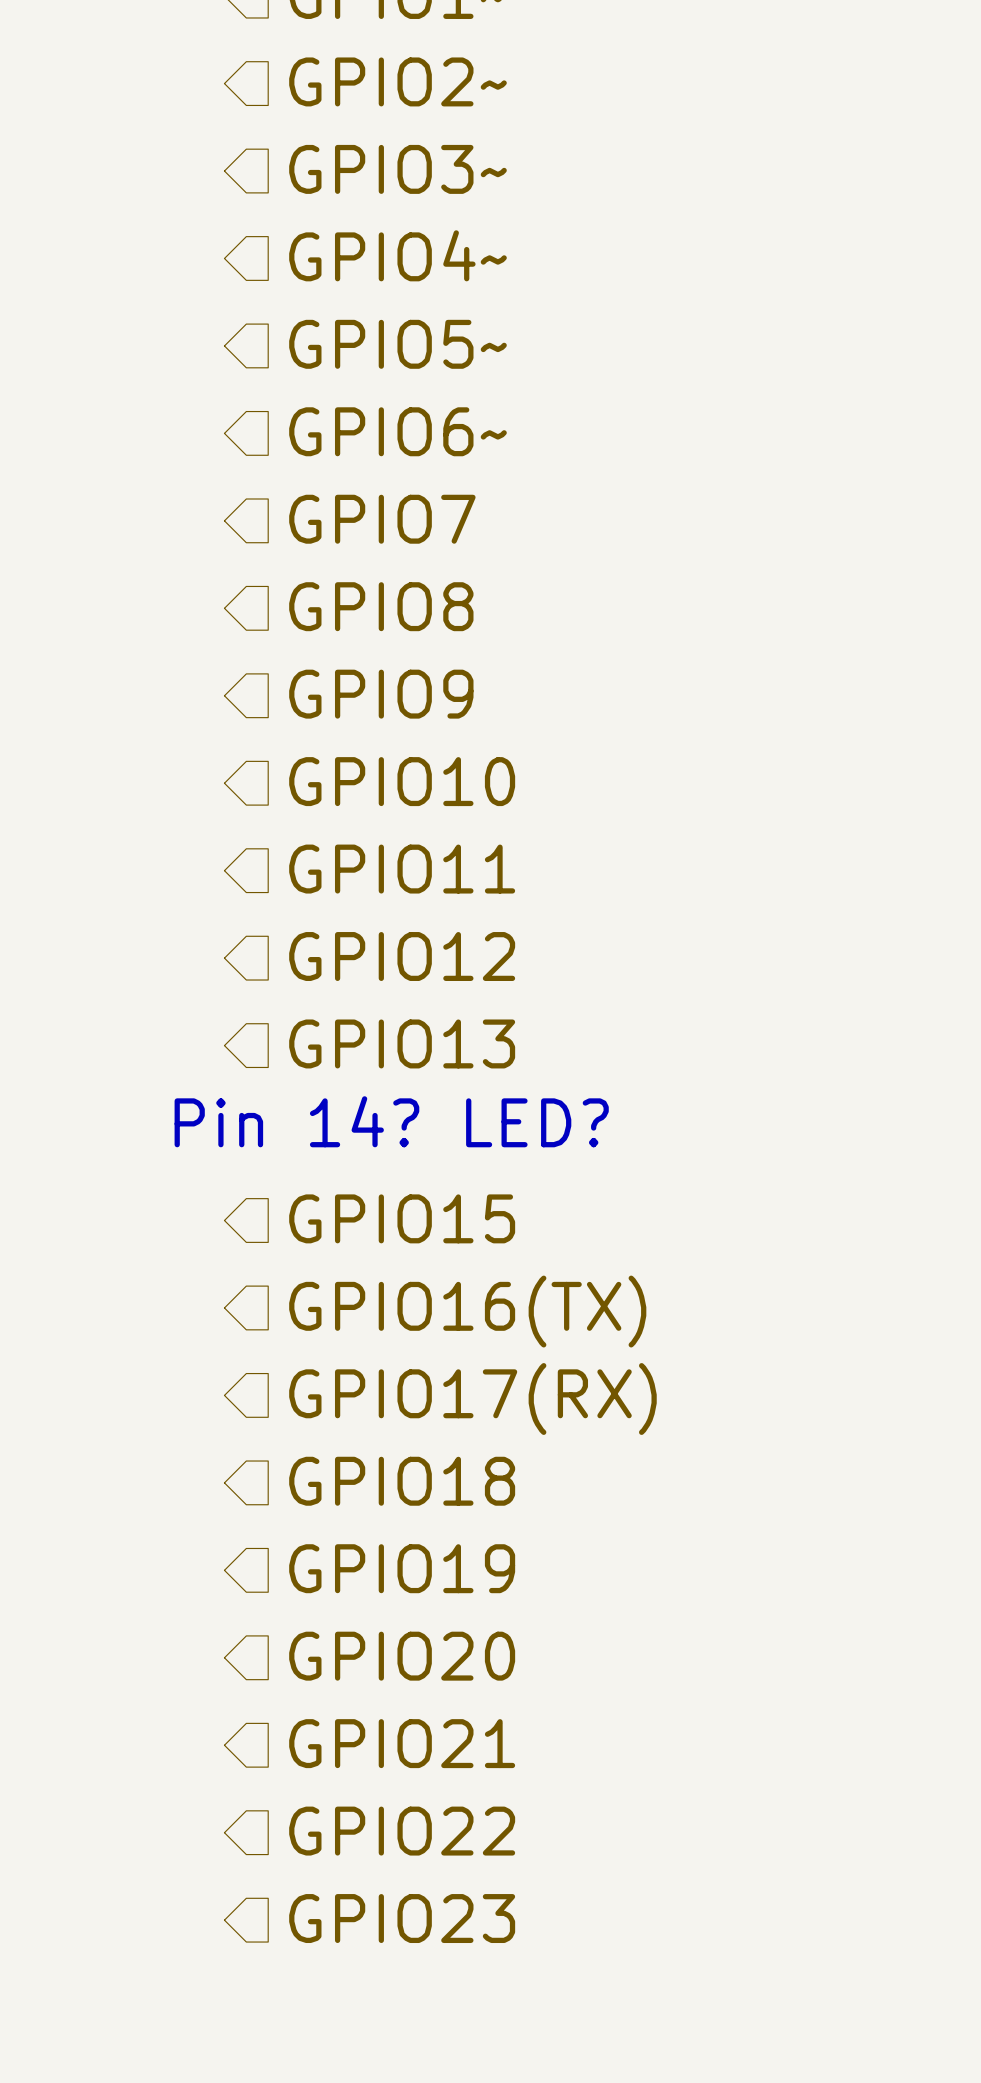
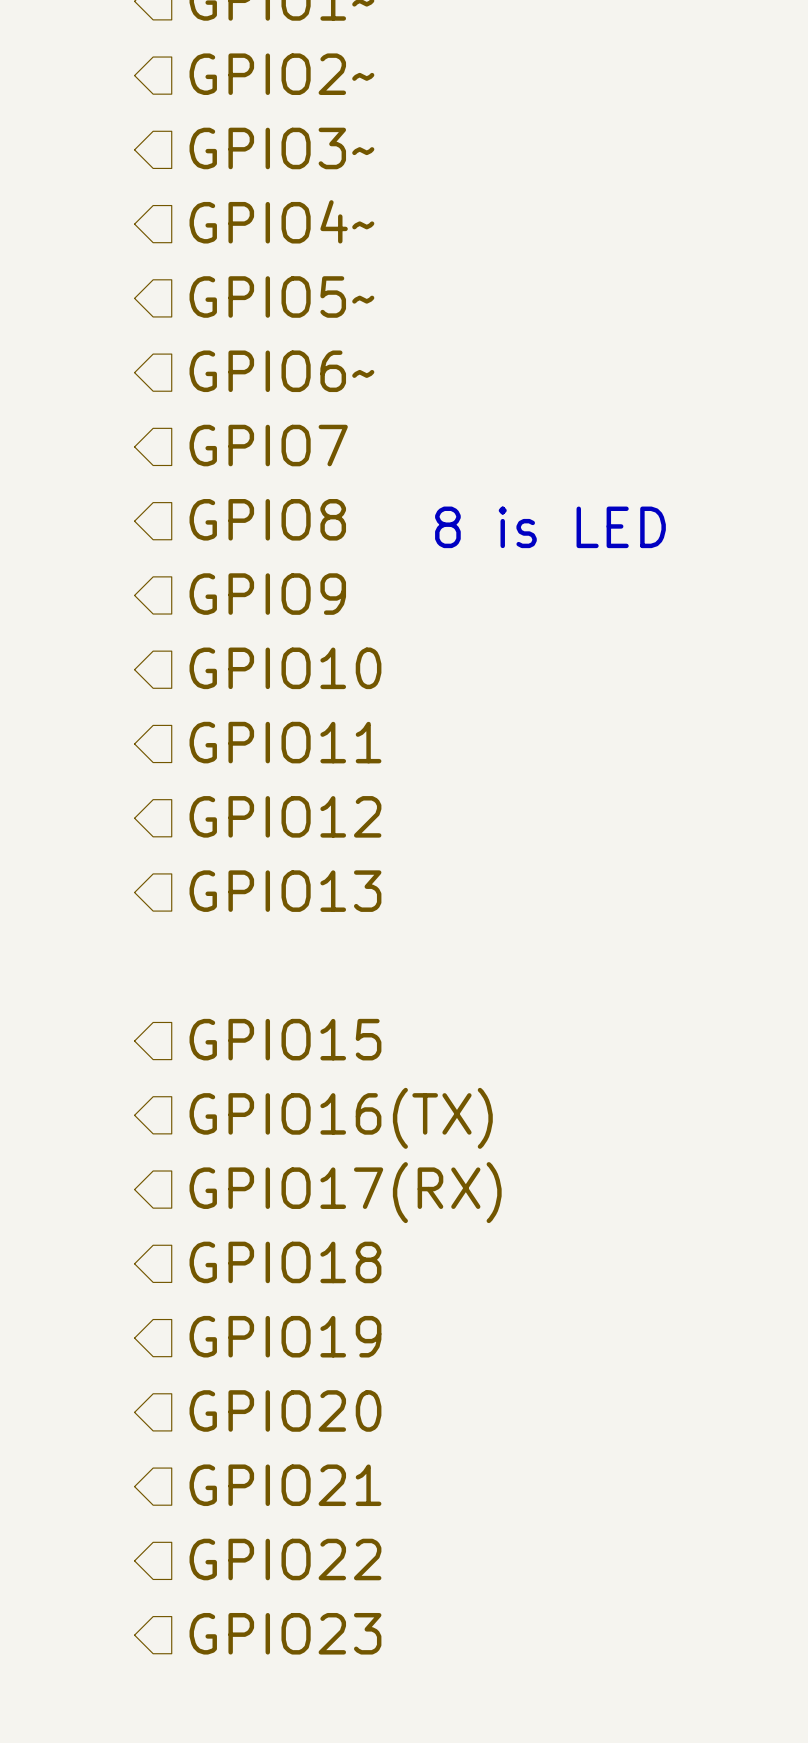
text: none -> 8 is LED (550, 527)
text: Pin 14? LED? (391, 1121) -> none

